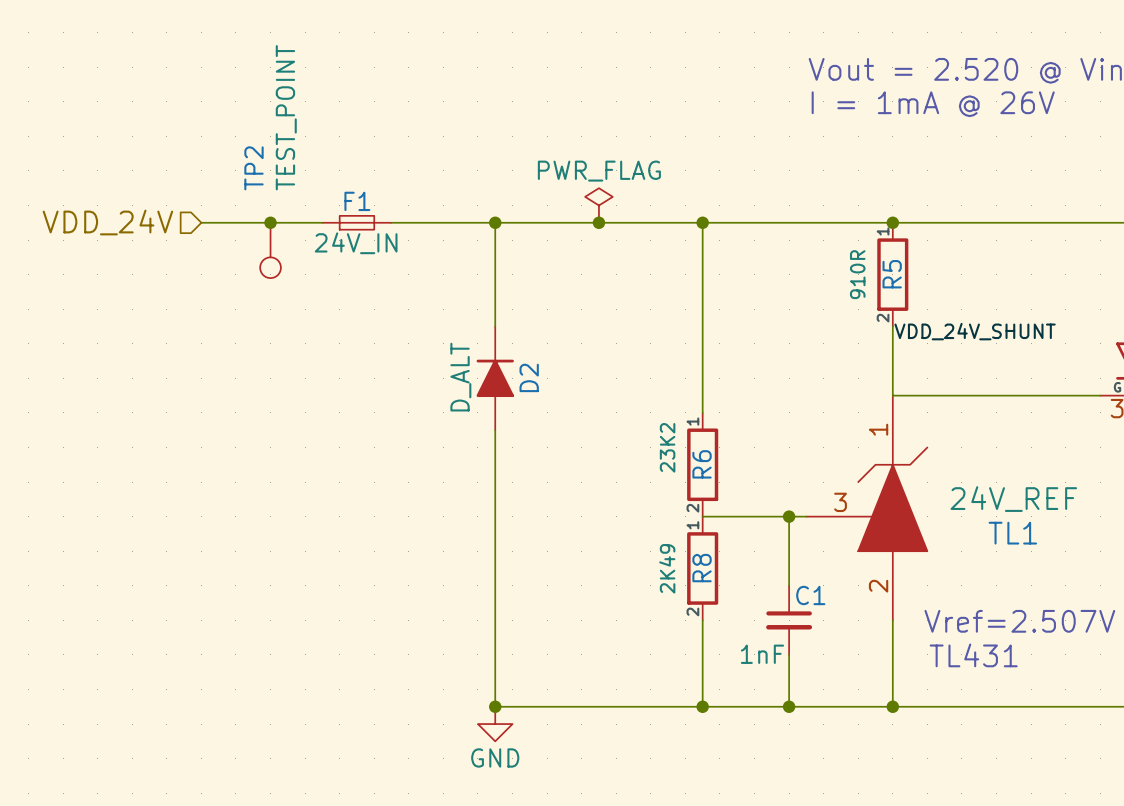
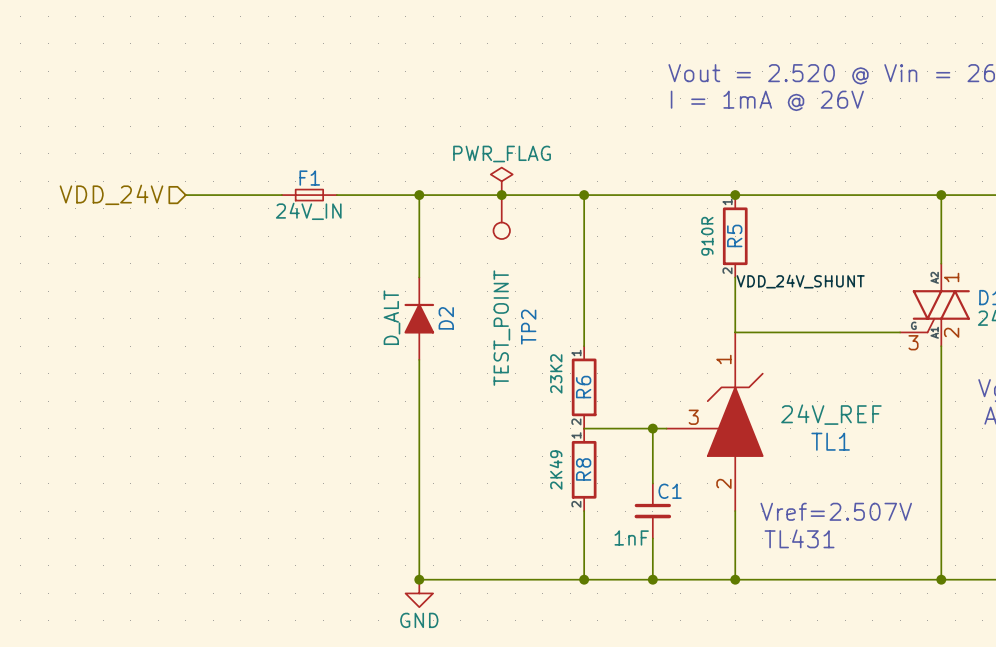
TP2 value position: TEST_POINT (286, 117) -> TEST_POINT (501, 328)
TP2 name position: TP2 (253, 168) -> TP2 (528, 327)
junction: (270, 222) -> none
TP2 position: (270, 250) -> (501, 217)

